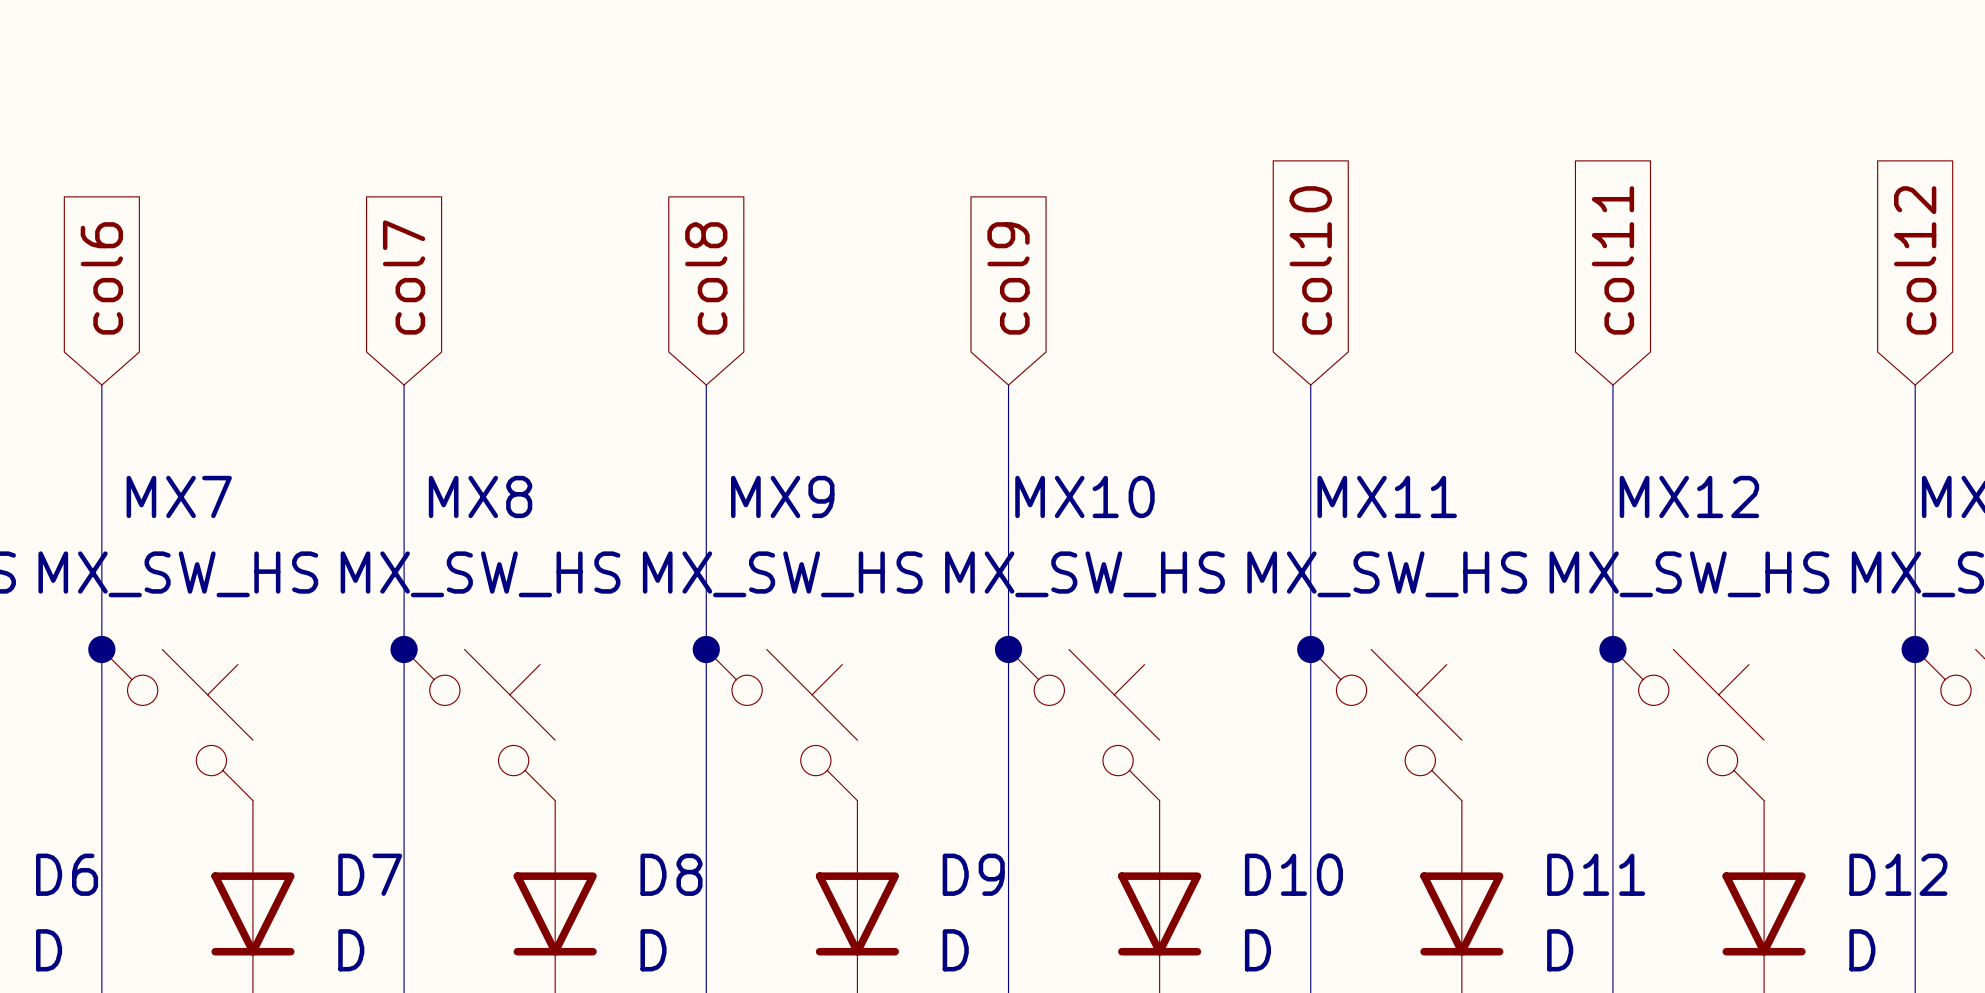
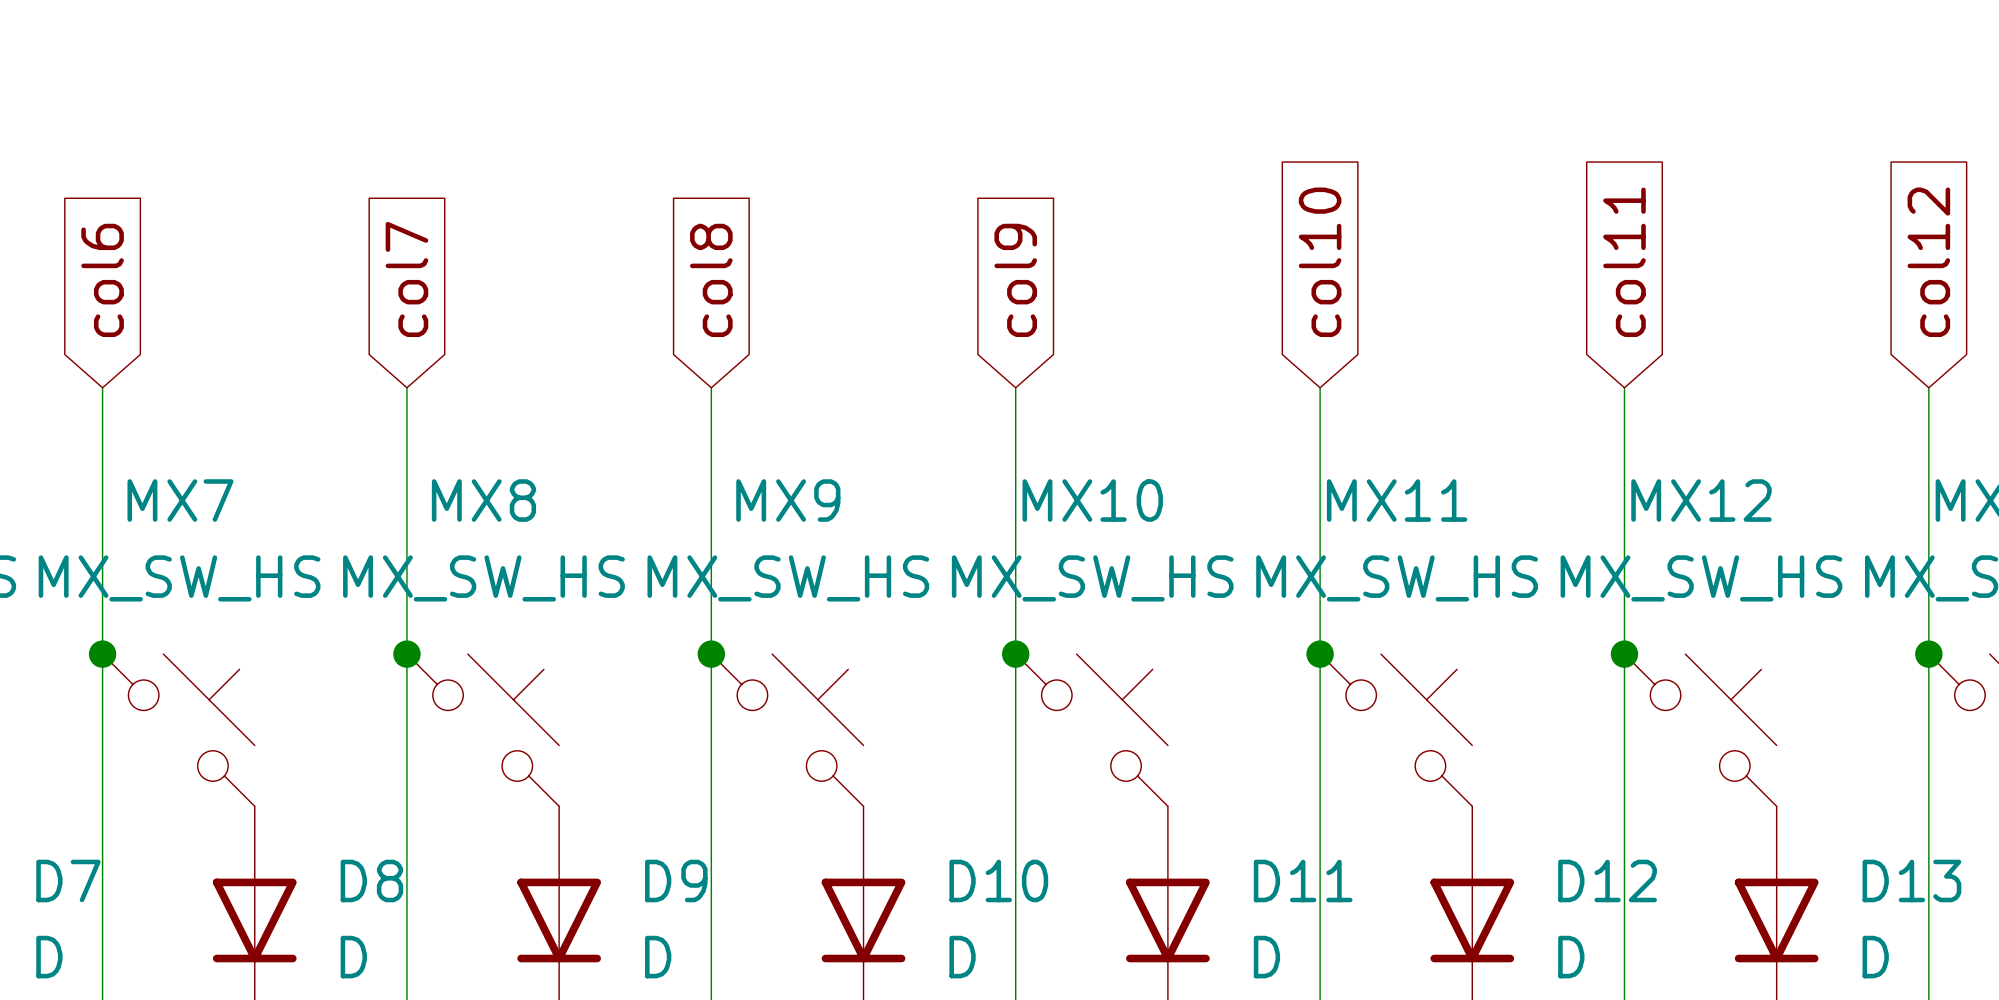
D6 name: D6 (67, 874) -> D7 (68, 880)
D7 name: D7 (370, 874) -> D8 (371, 880)
D8 name: D8 (671, 874) -> D9 (676, 880)
D9 name: D9 (973, 874) -> D10 (998, 880)
D10 name: D10 (1293, 874) -> D11 (1303, 880)
D11 name: D11 (1596, 874) -> D12 (1607, 880)
D12 name: D12 (1898, 874) -> D13 (1911, 880)

